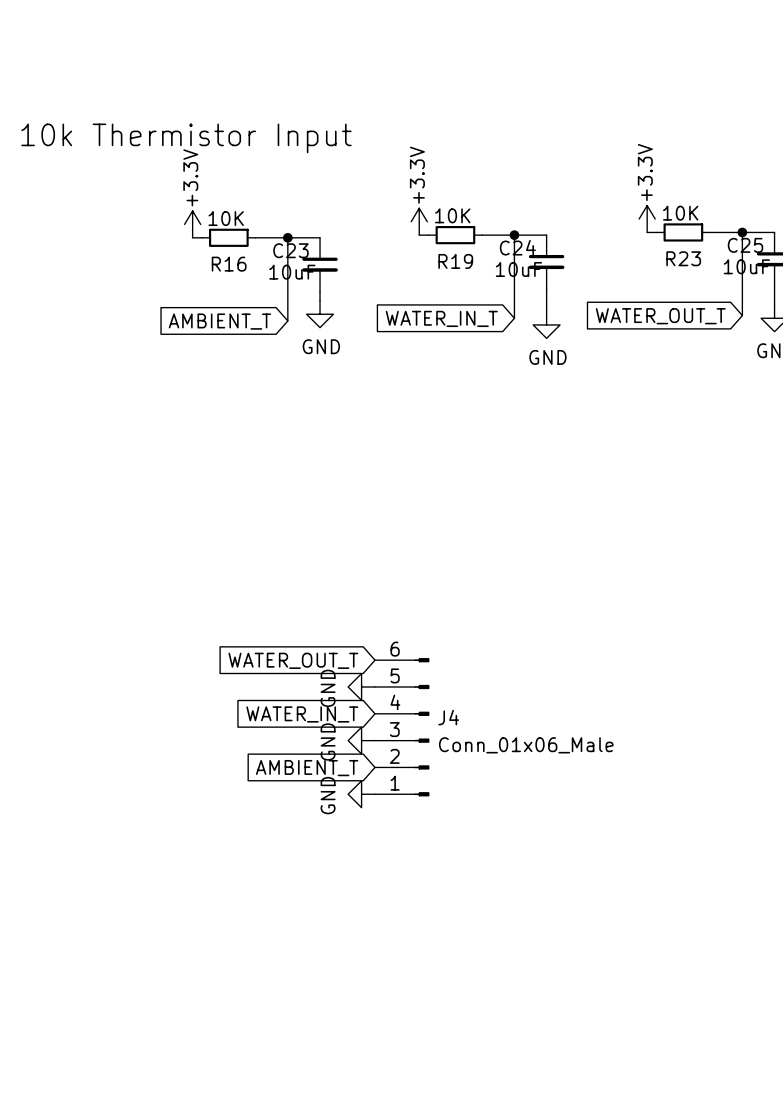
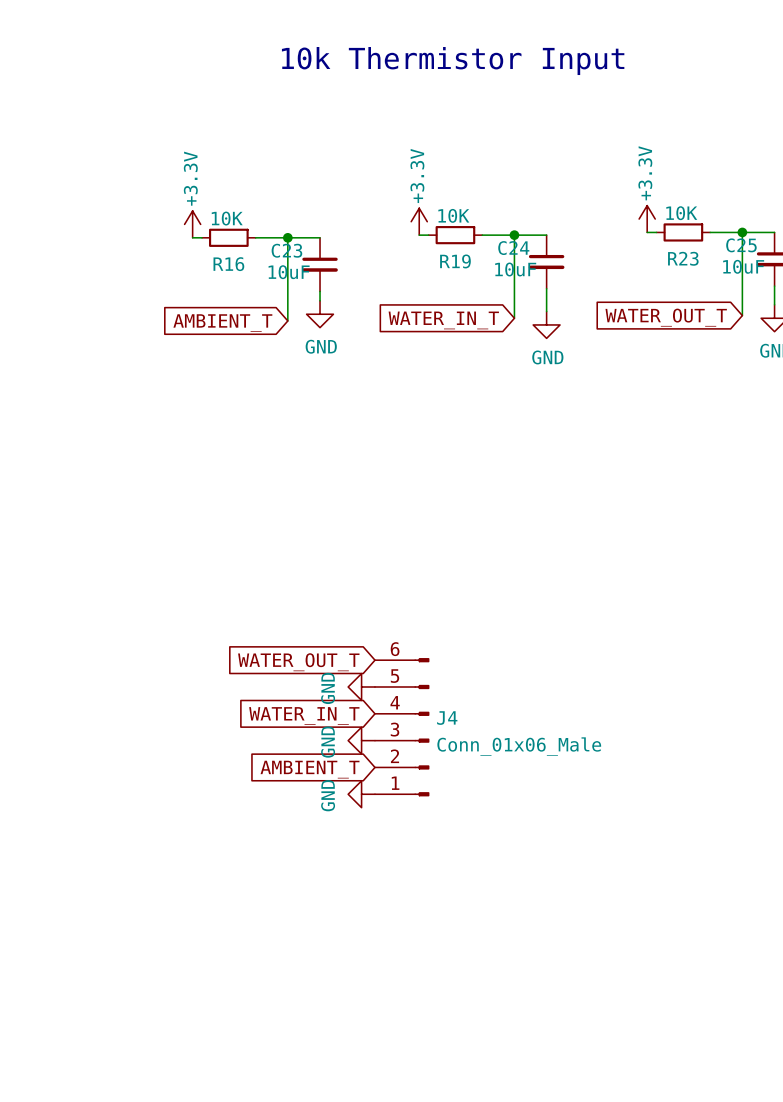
text: none -> 10k Thermistor Input (453, 61)
text: 10k Thermistor Input (186, 138) -> none

